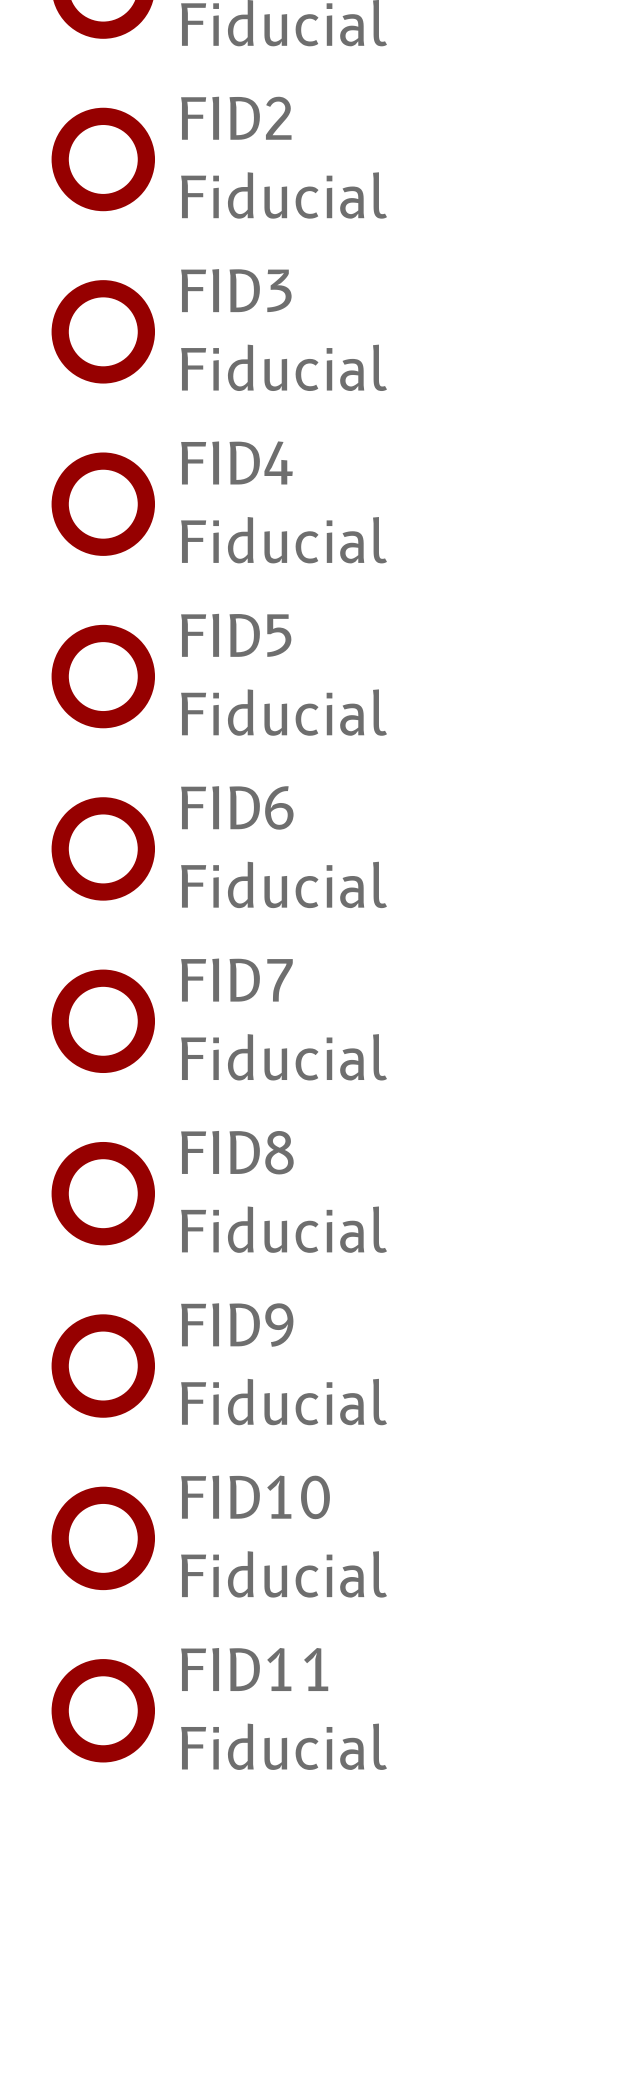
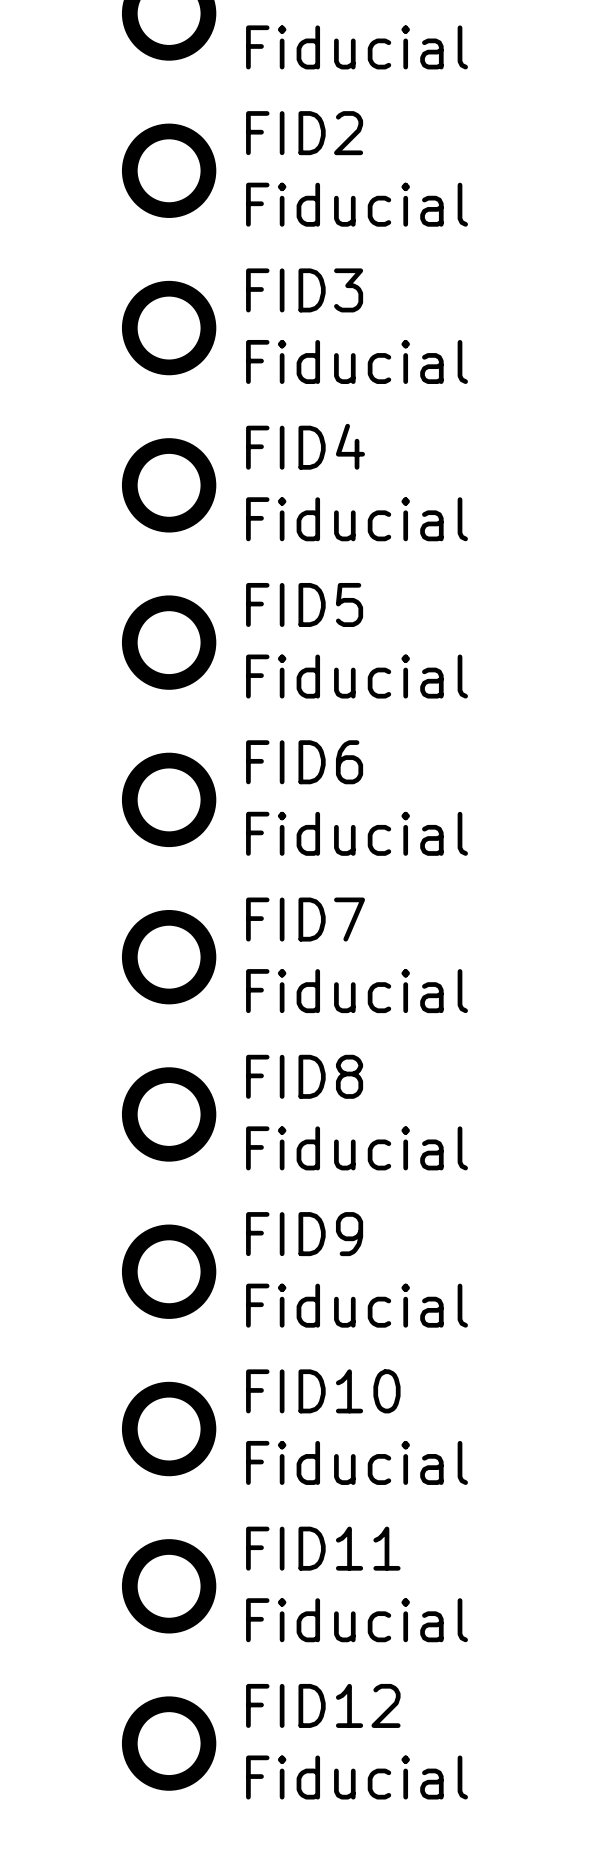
FID12: none -> Fiducial (169, 1743)

